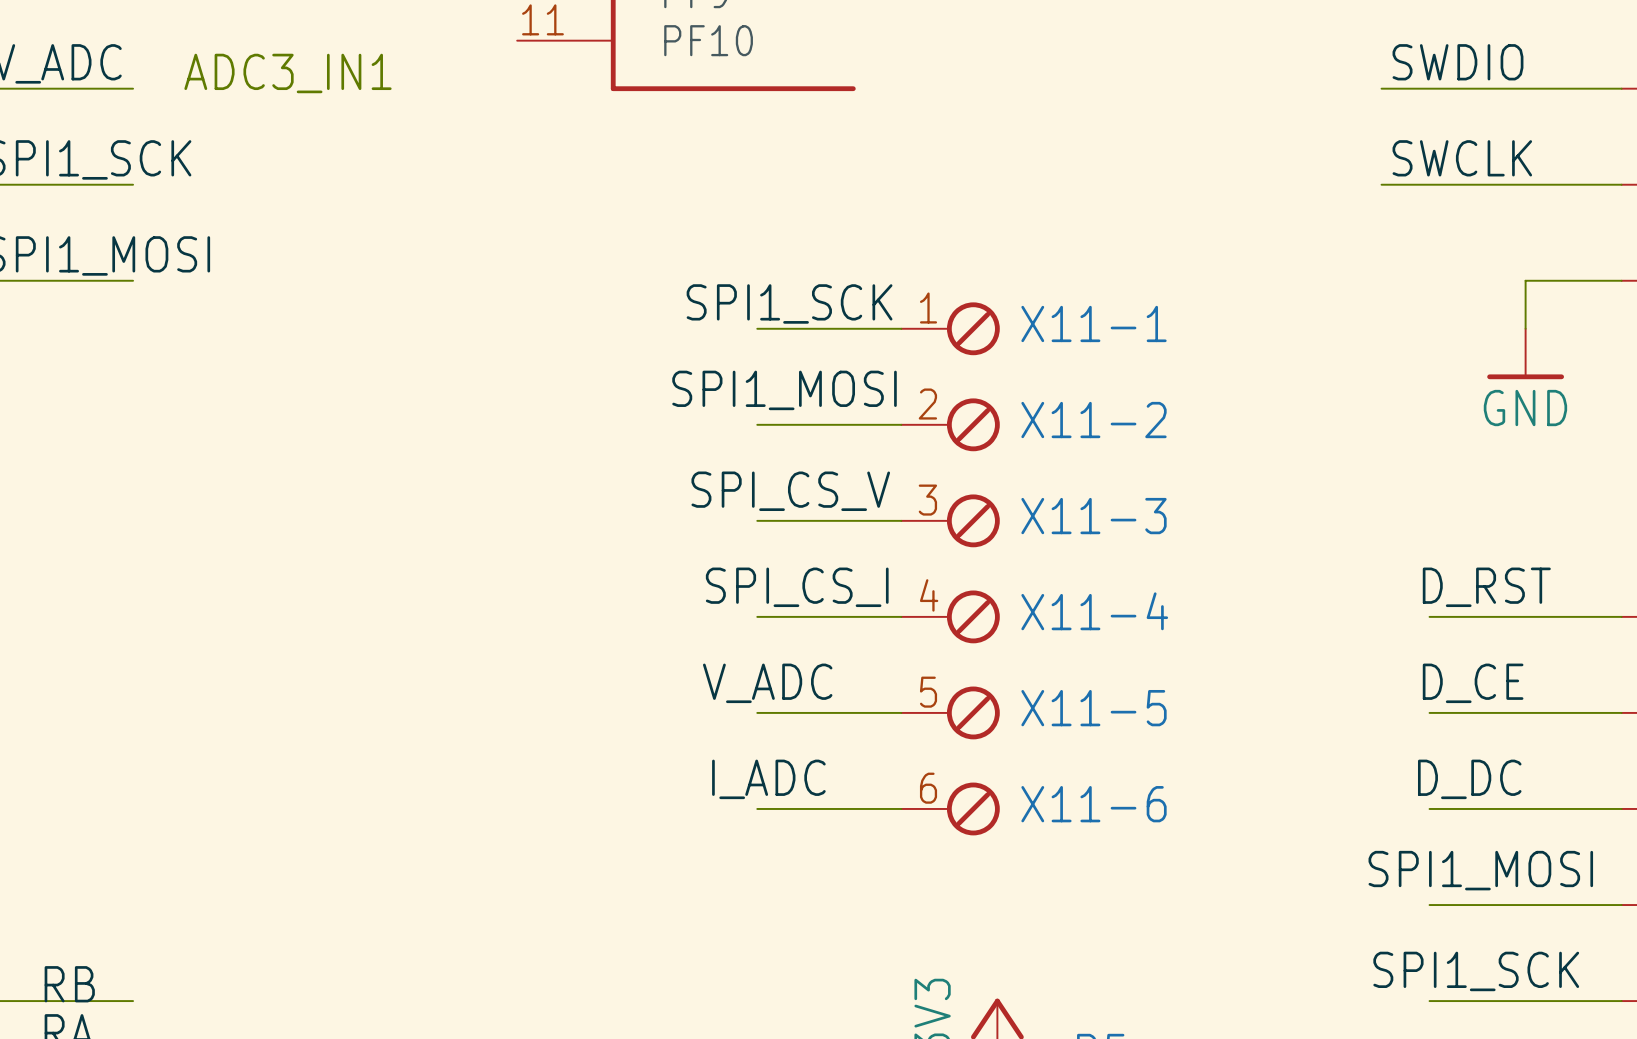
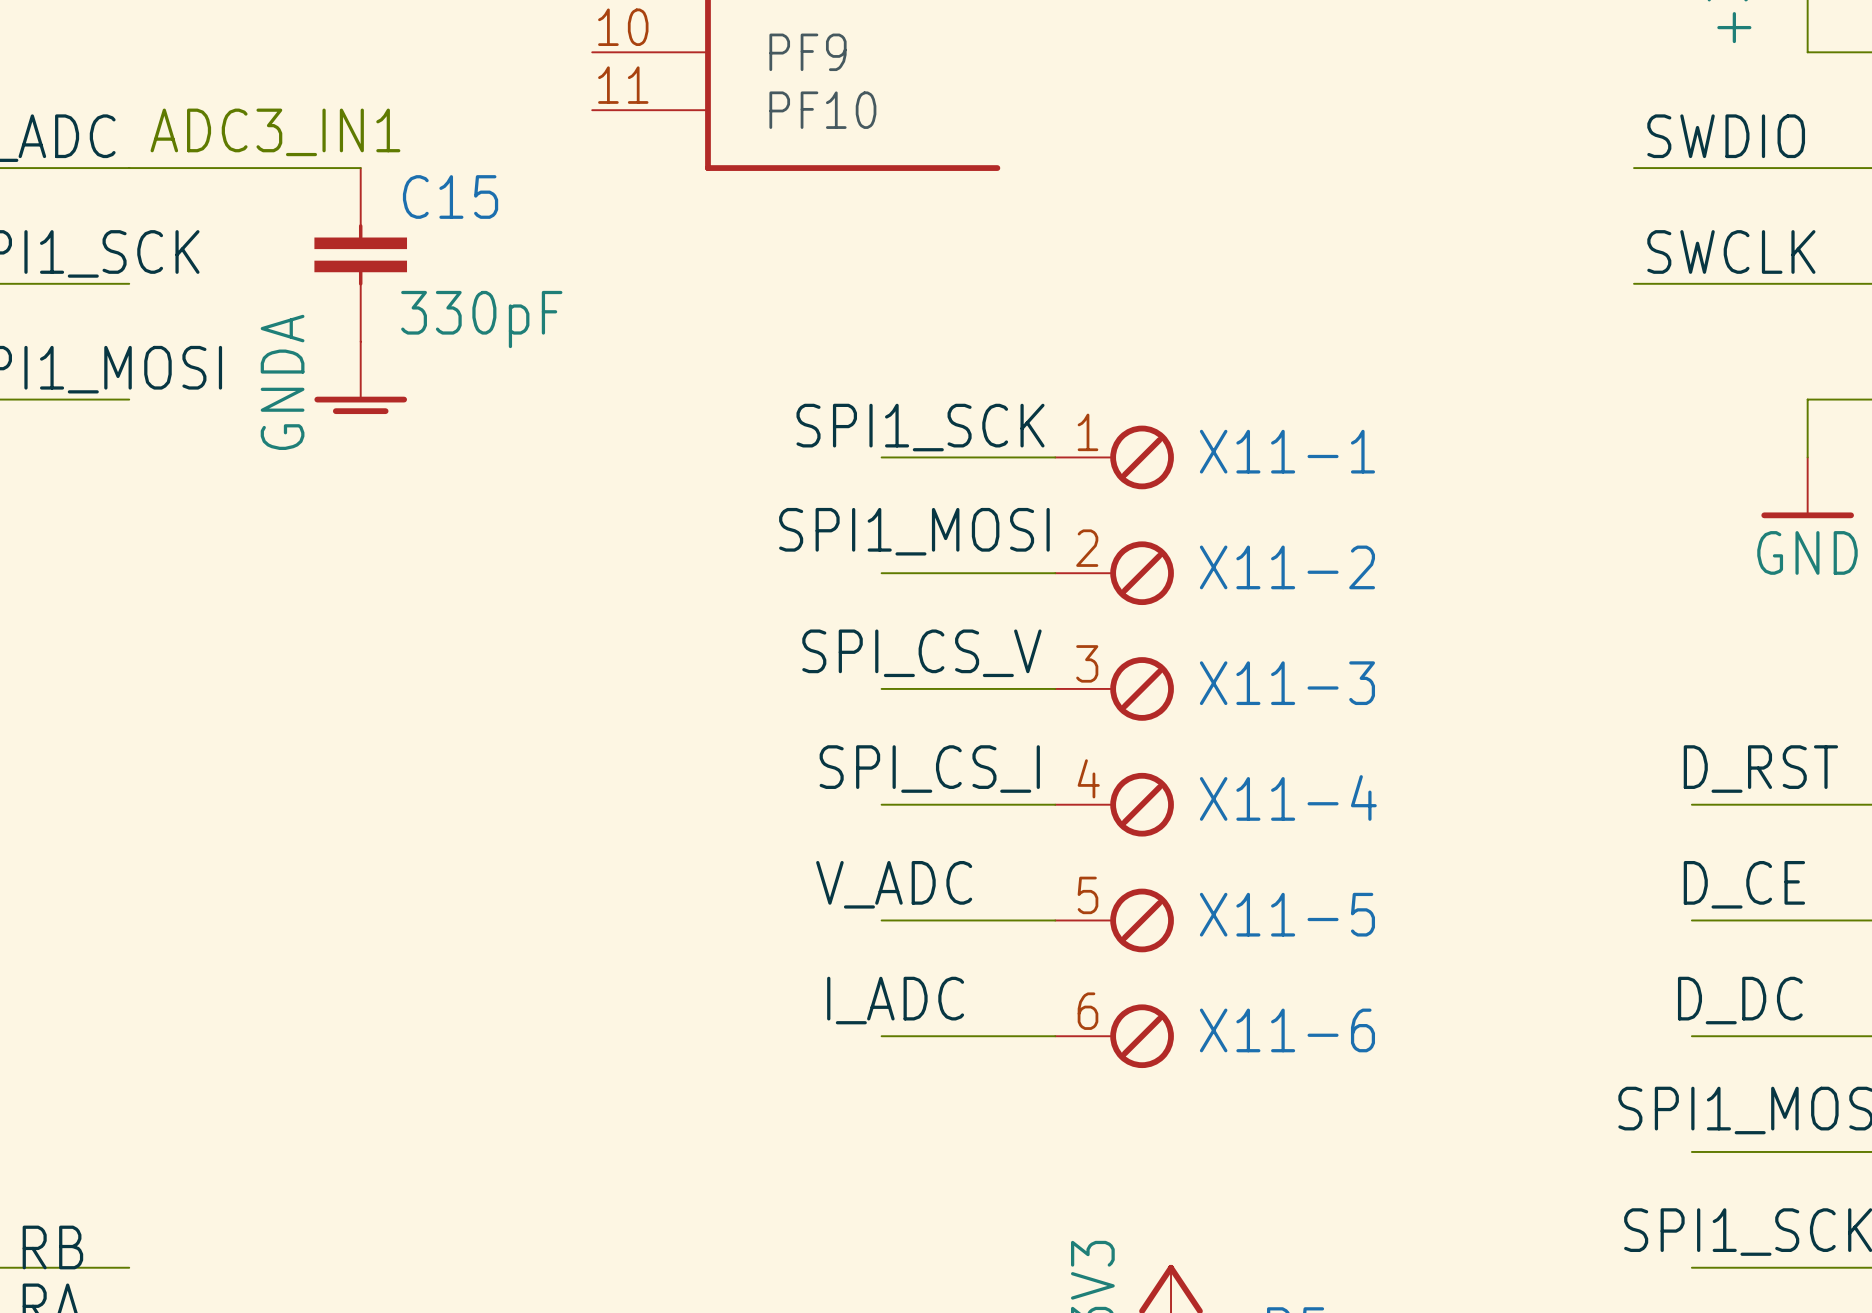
text position: ADC3_IN1 (287, 73) -> ADC3_IN1 (275, 132)
wire: none -> (129, 168) (360, 168)
C15: none -> 330pF (360, 254)
power symbol: none -> GNDA (360, 377)

